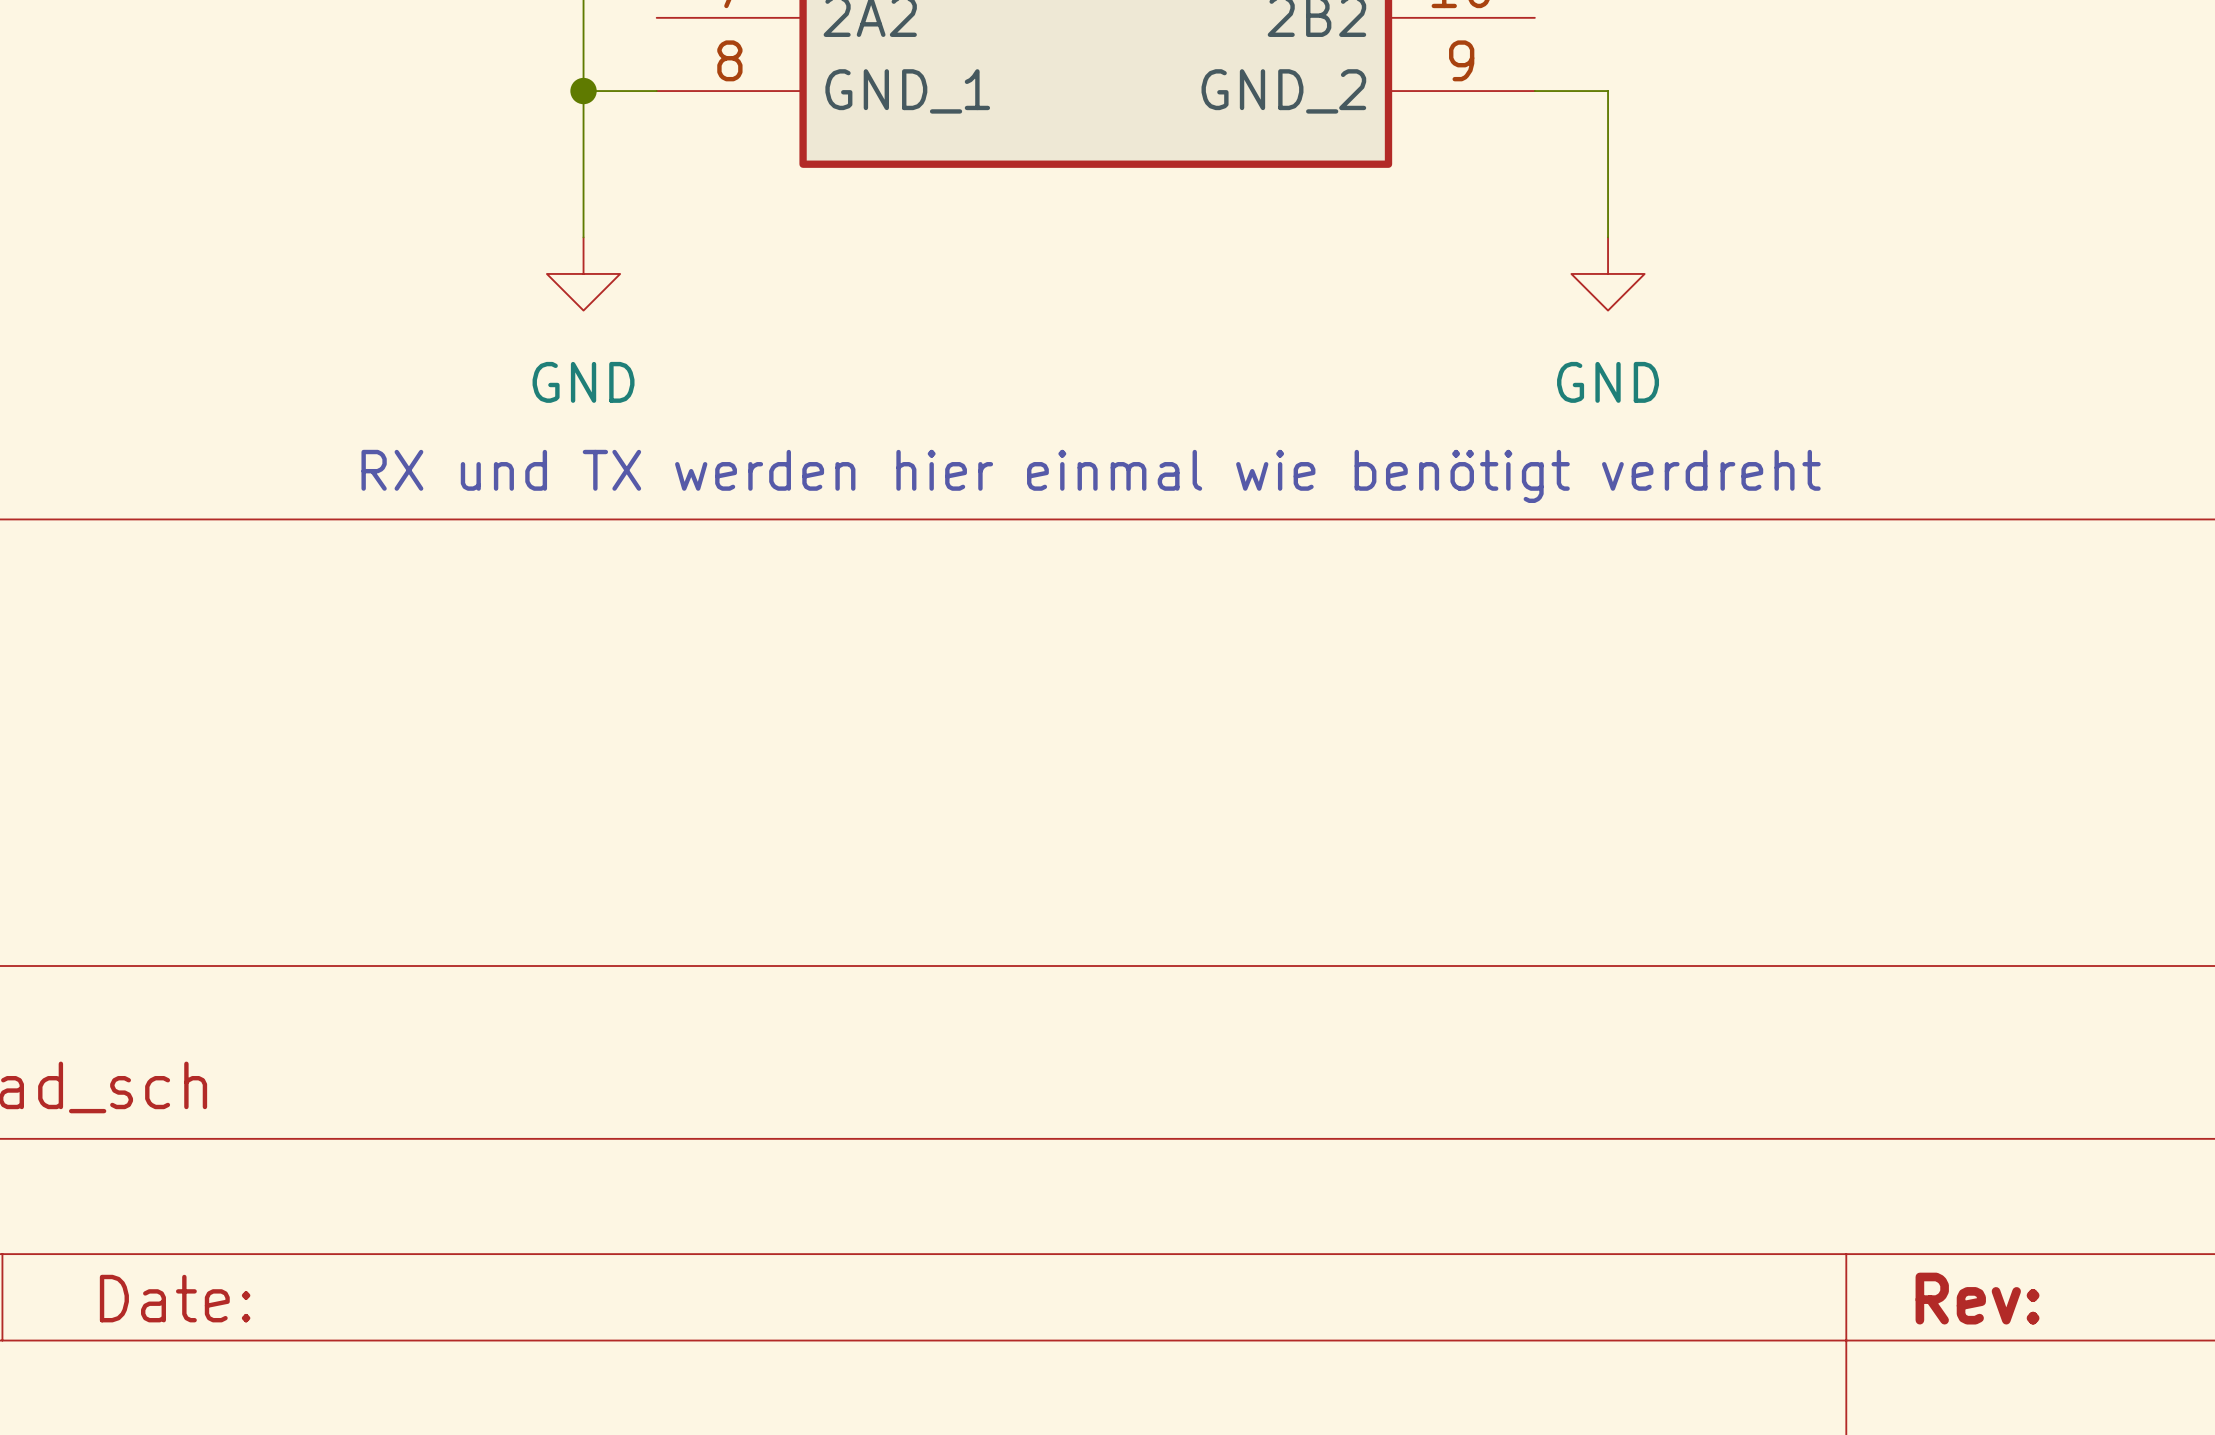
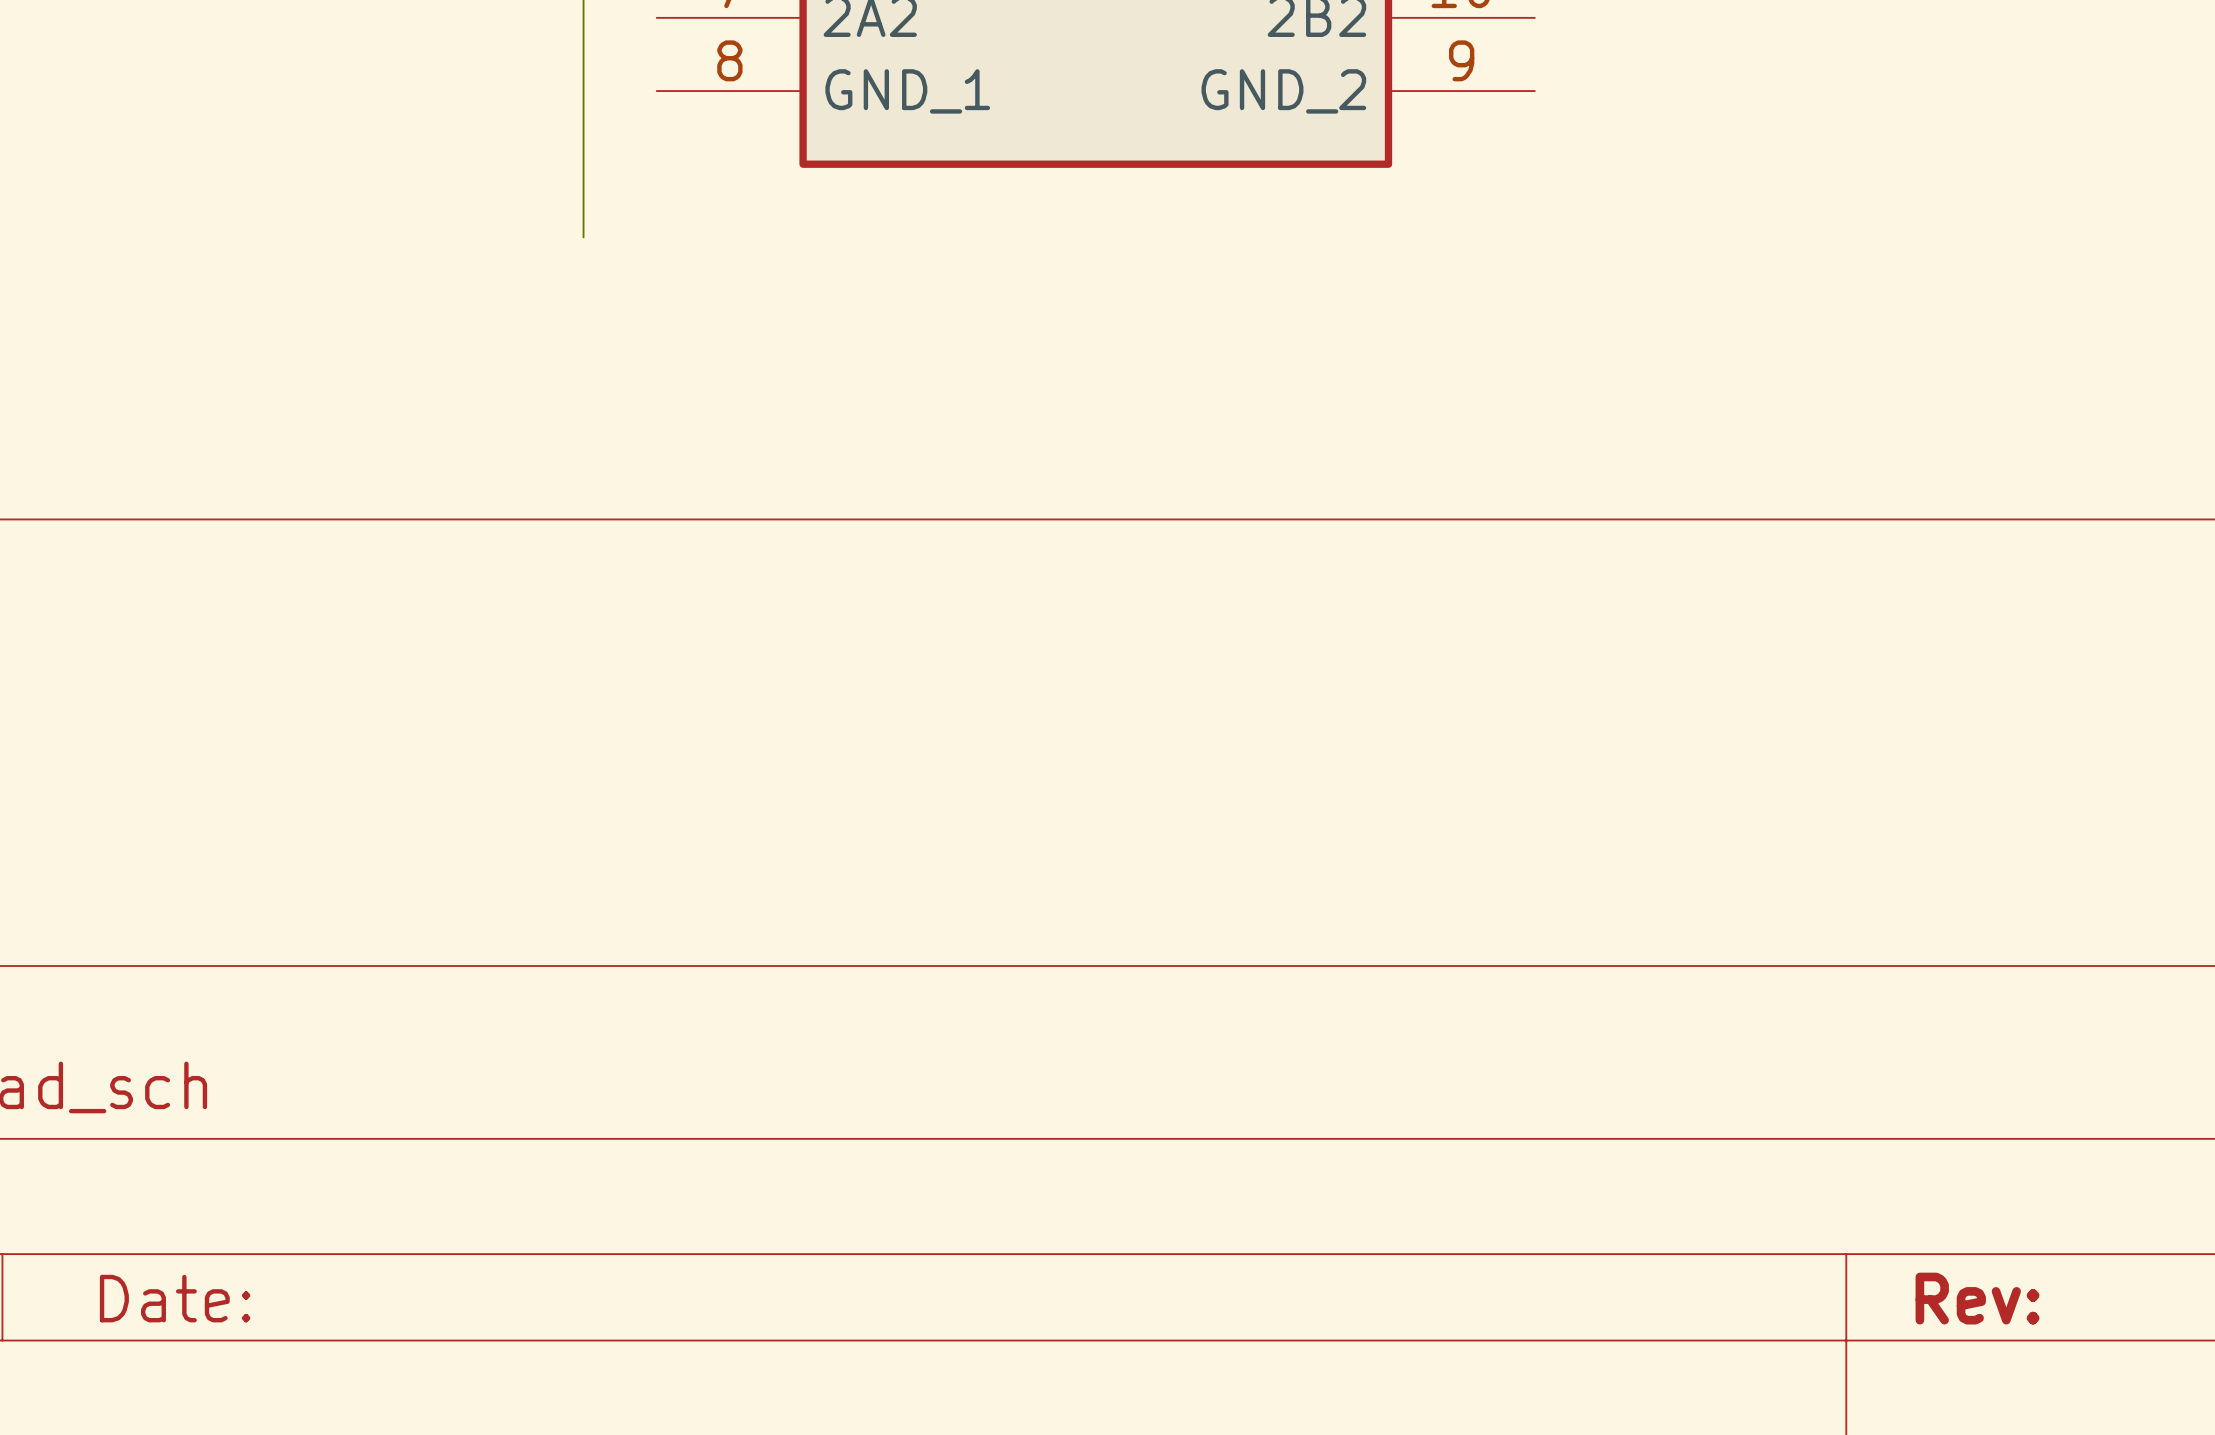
wire: (583, 91) (656, 91) -> none
junction: (583, 91) -> none
wire: (1534, 91) (1608, 91) (1608, 237) -> none
power symbol: GND (583, 273) -> none
power symbol: GND (1608, 273) -> none
text: RX und TX werden hier einmal wie benötigt verdreht (1091, 476) -> none

